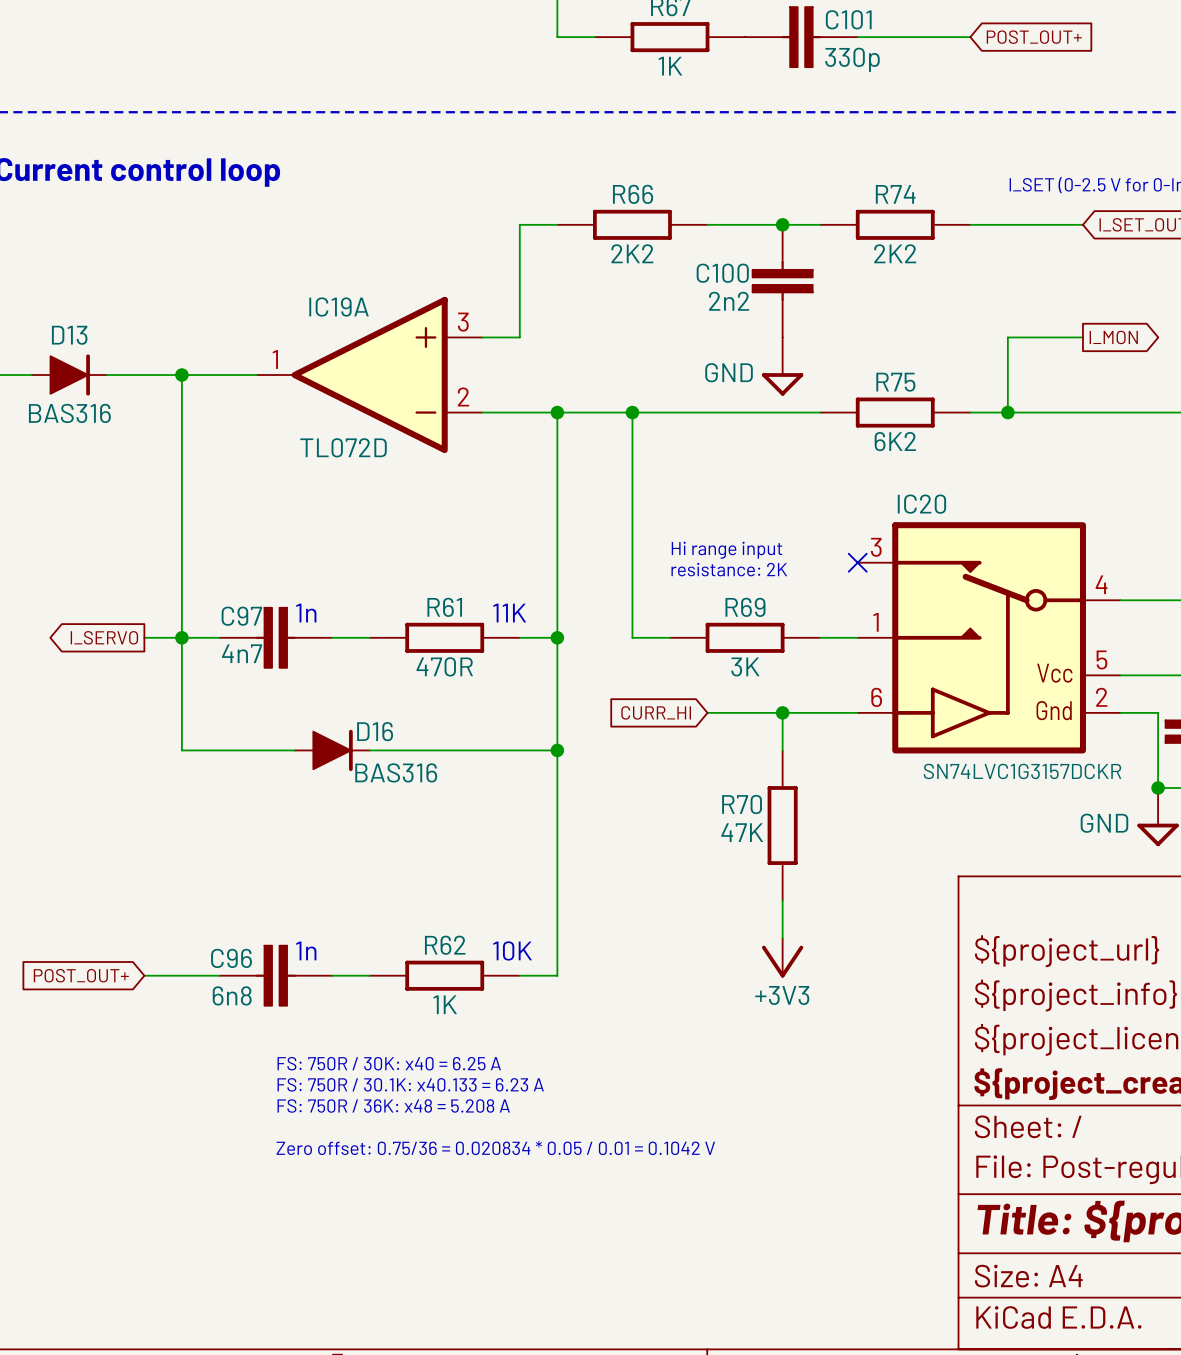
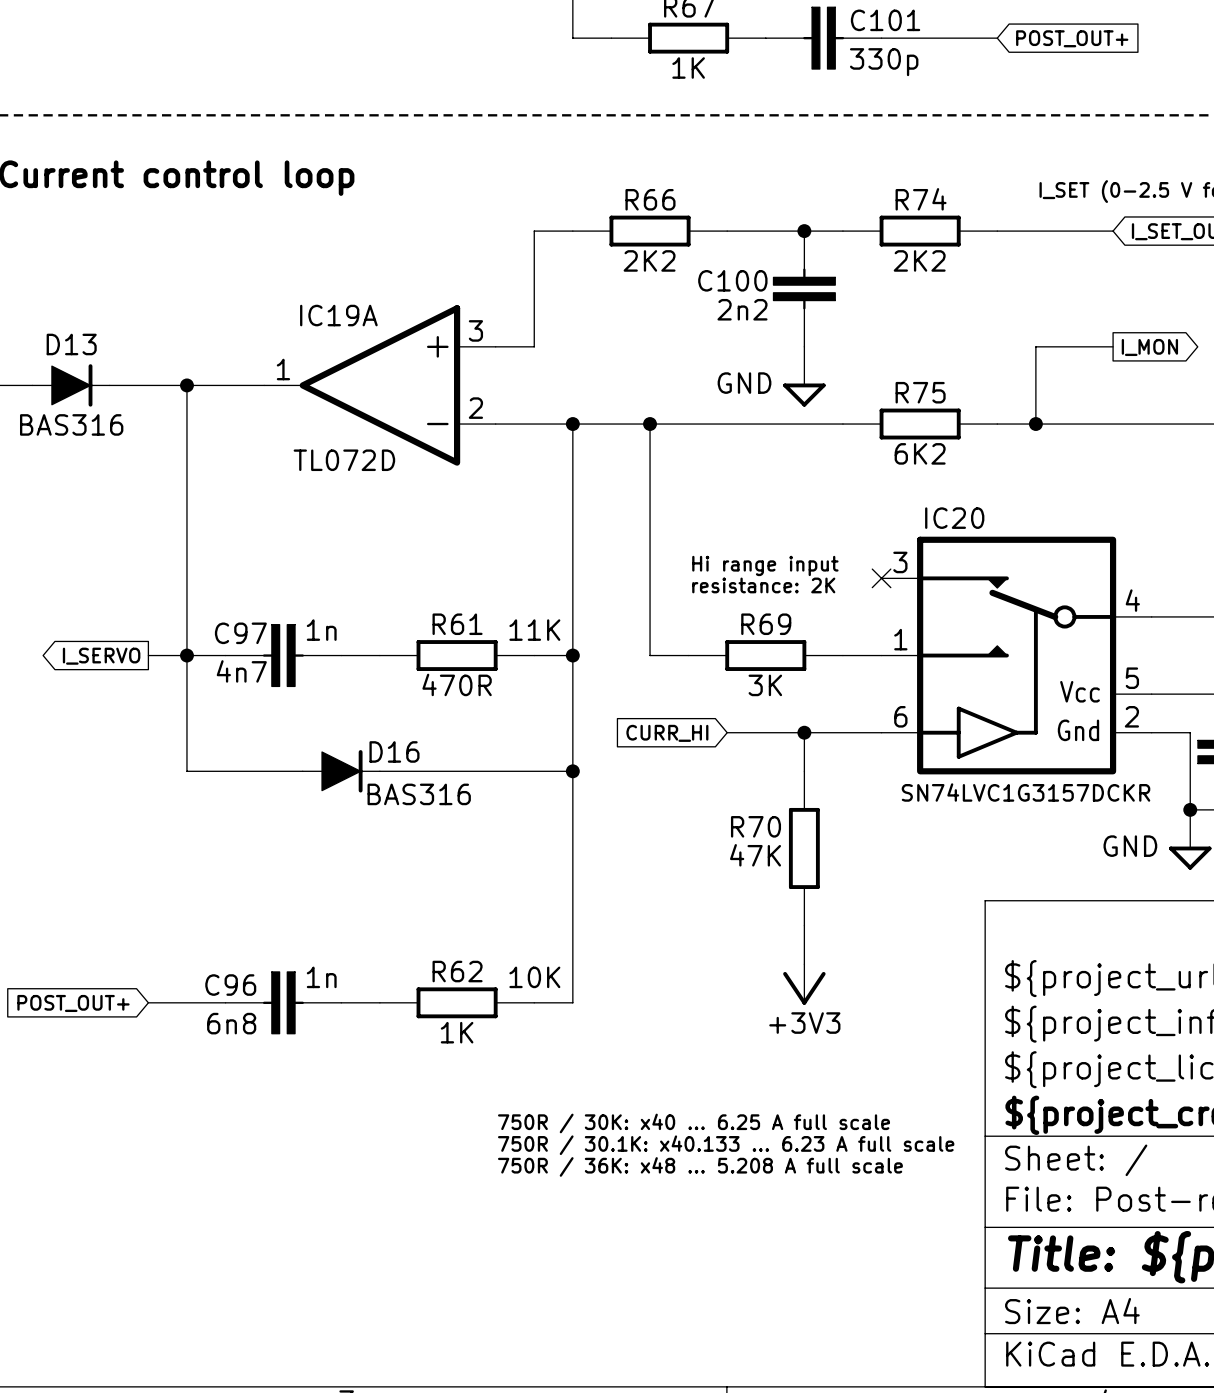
text: FS: 750R / 30K: x40 = 6.25 A (389, 1063) -> none
text: FS: 750R / 30.1K: x40.133 = 6.23 A (410, 1084) -> 750R / 30K: x40 ... 6.25 A full scale (693, 1123)
text: FS: 750R / 36K: x48 = 5.208 A (393, 1105) -> none
text: none -> 750R / 30.1K: x40.133 ... 6.23 A full scale (726, 1145)
text: none -> 750R / 36K: x48 ... 5.208 A full scale (700, 1166)
text: Zero offset: 0.75/36 = 0.020834 * 0.05 / 0.01 = 0.1042 V (495, 1147) -> none

